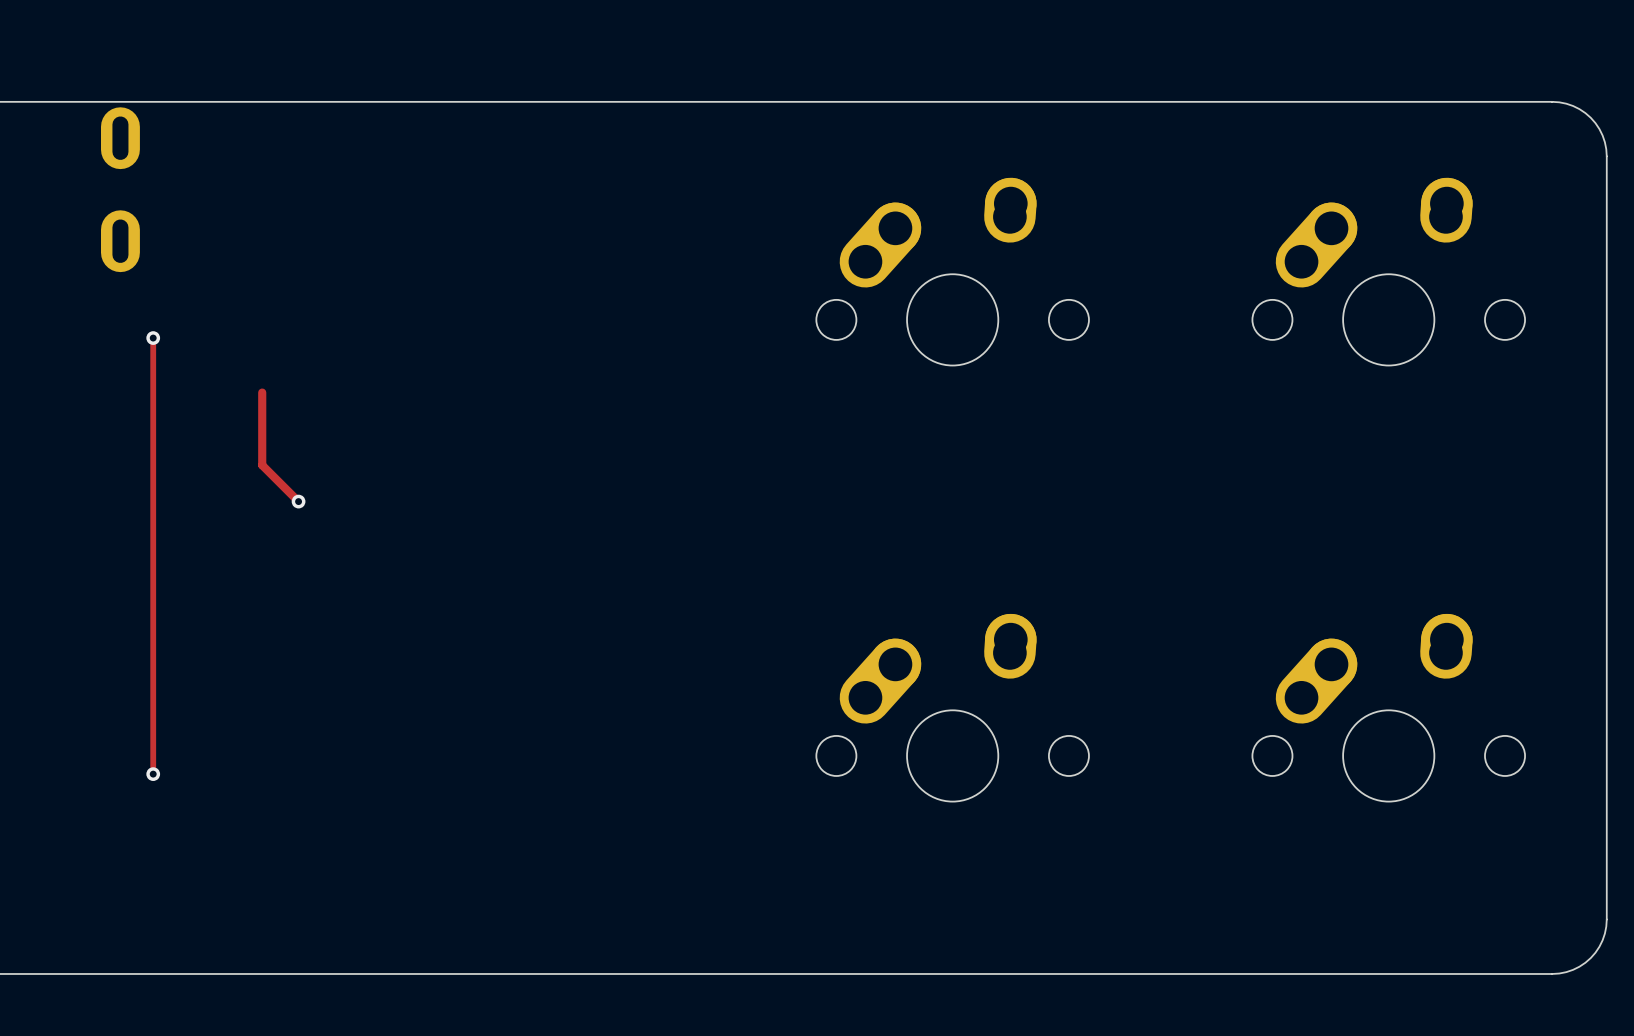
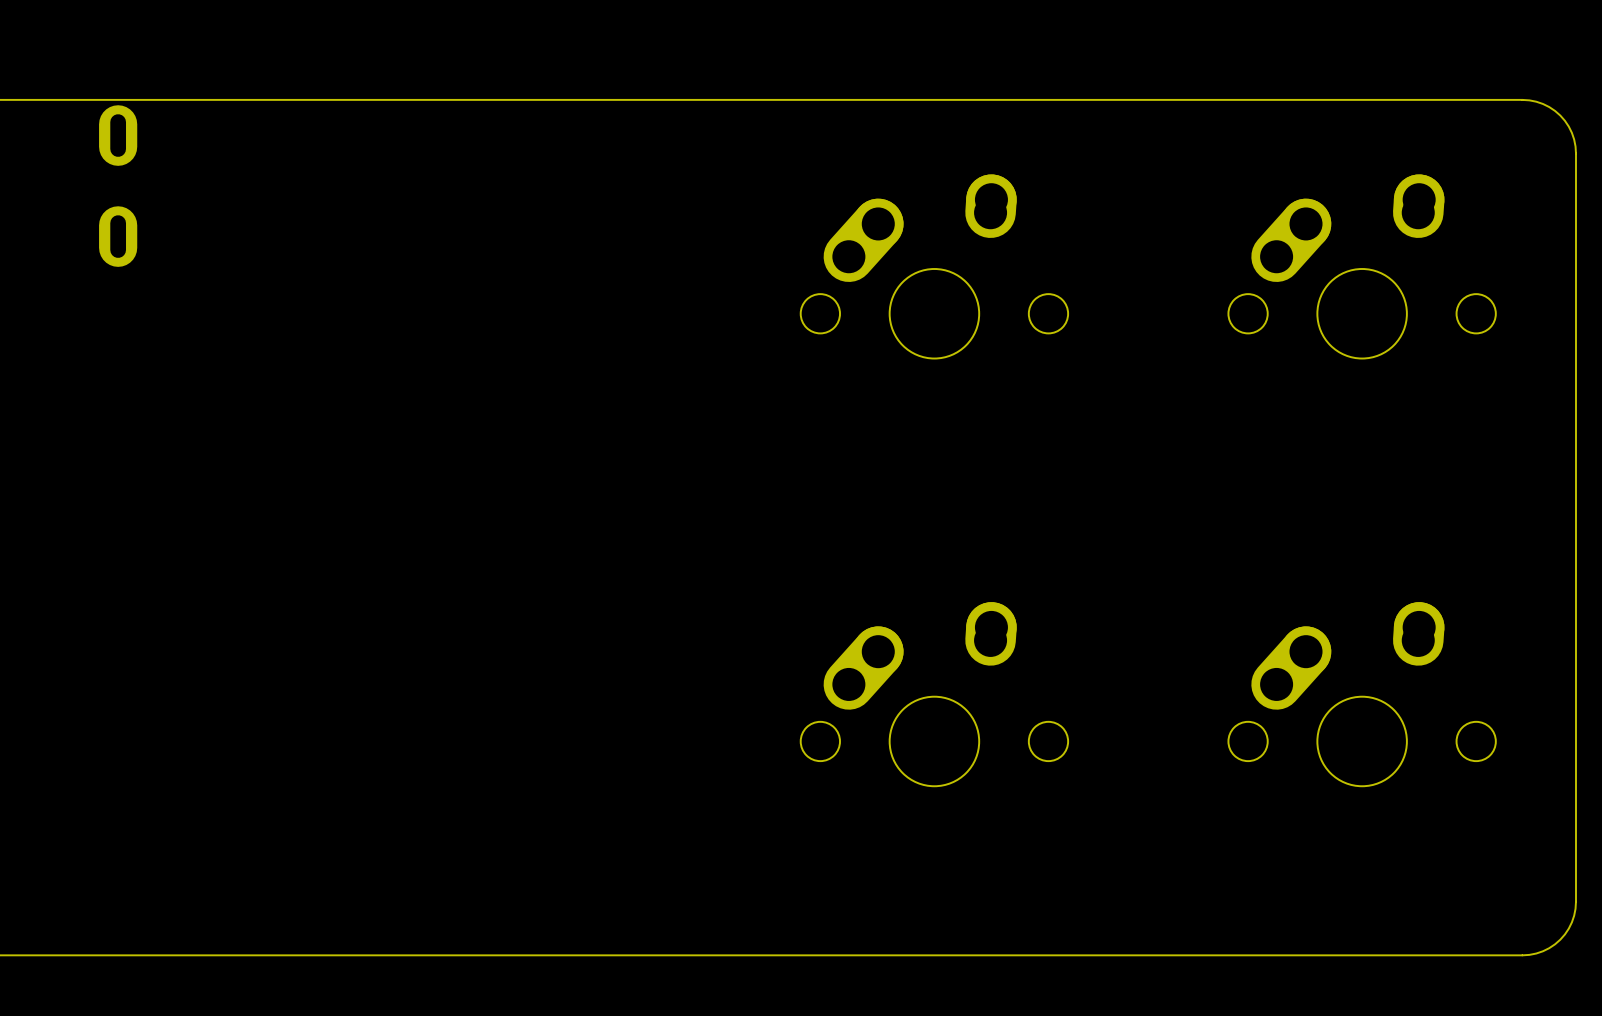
track: (153, 338) (153, 774) -> none
via: (153, 338) -> none
track: (262, 392) (262, 465) (298, 501) -> none
via: (298, 501) -> none
via: (153, 774) -> none

